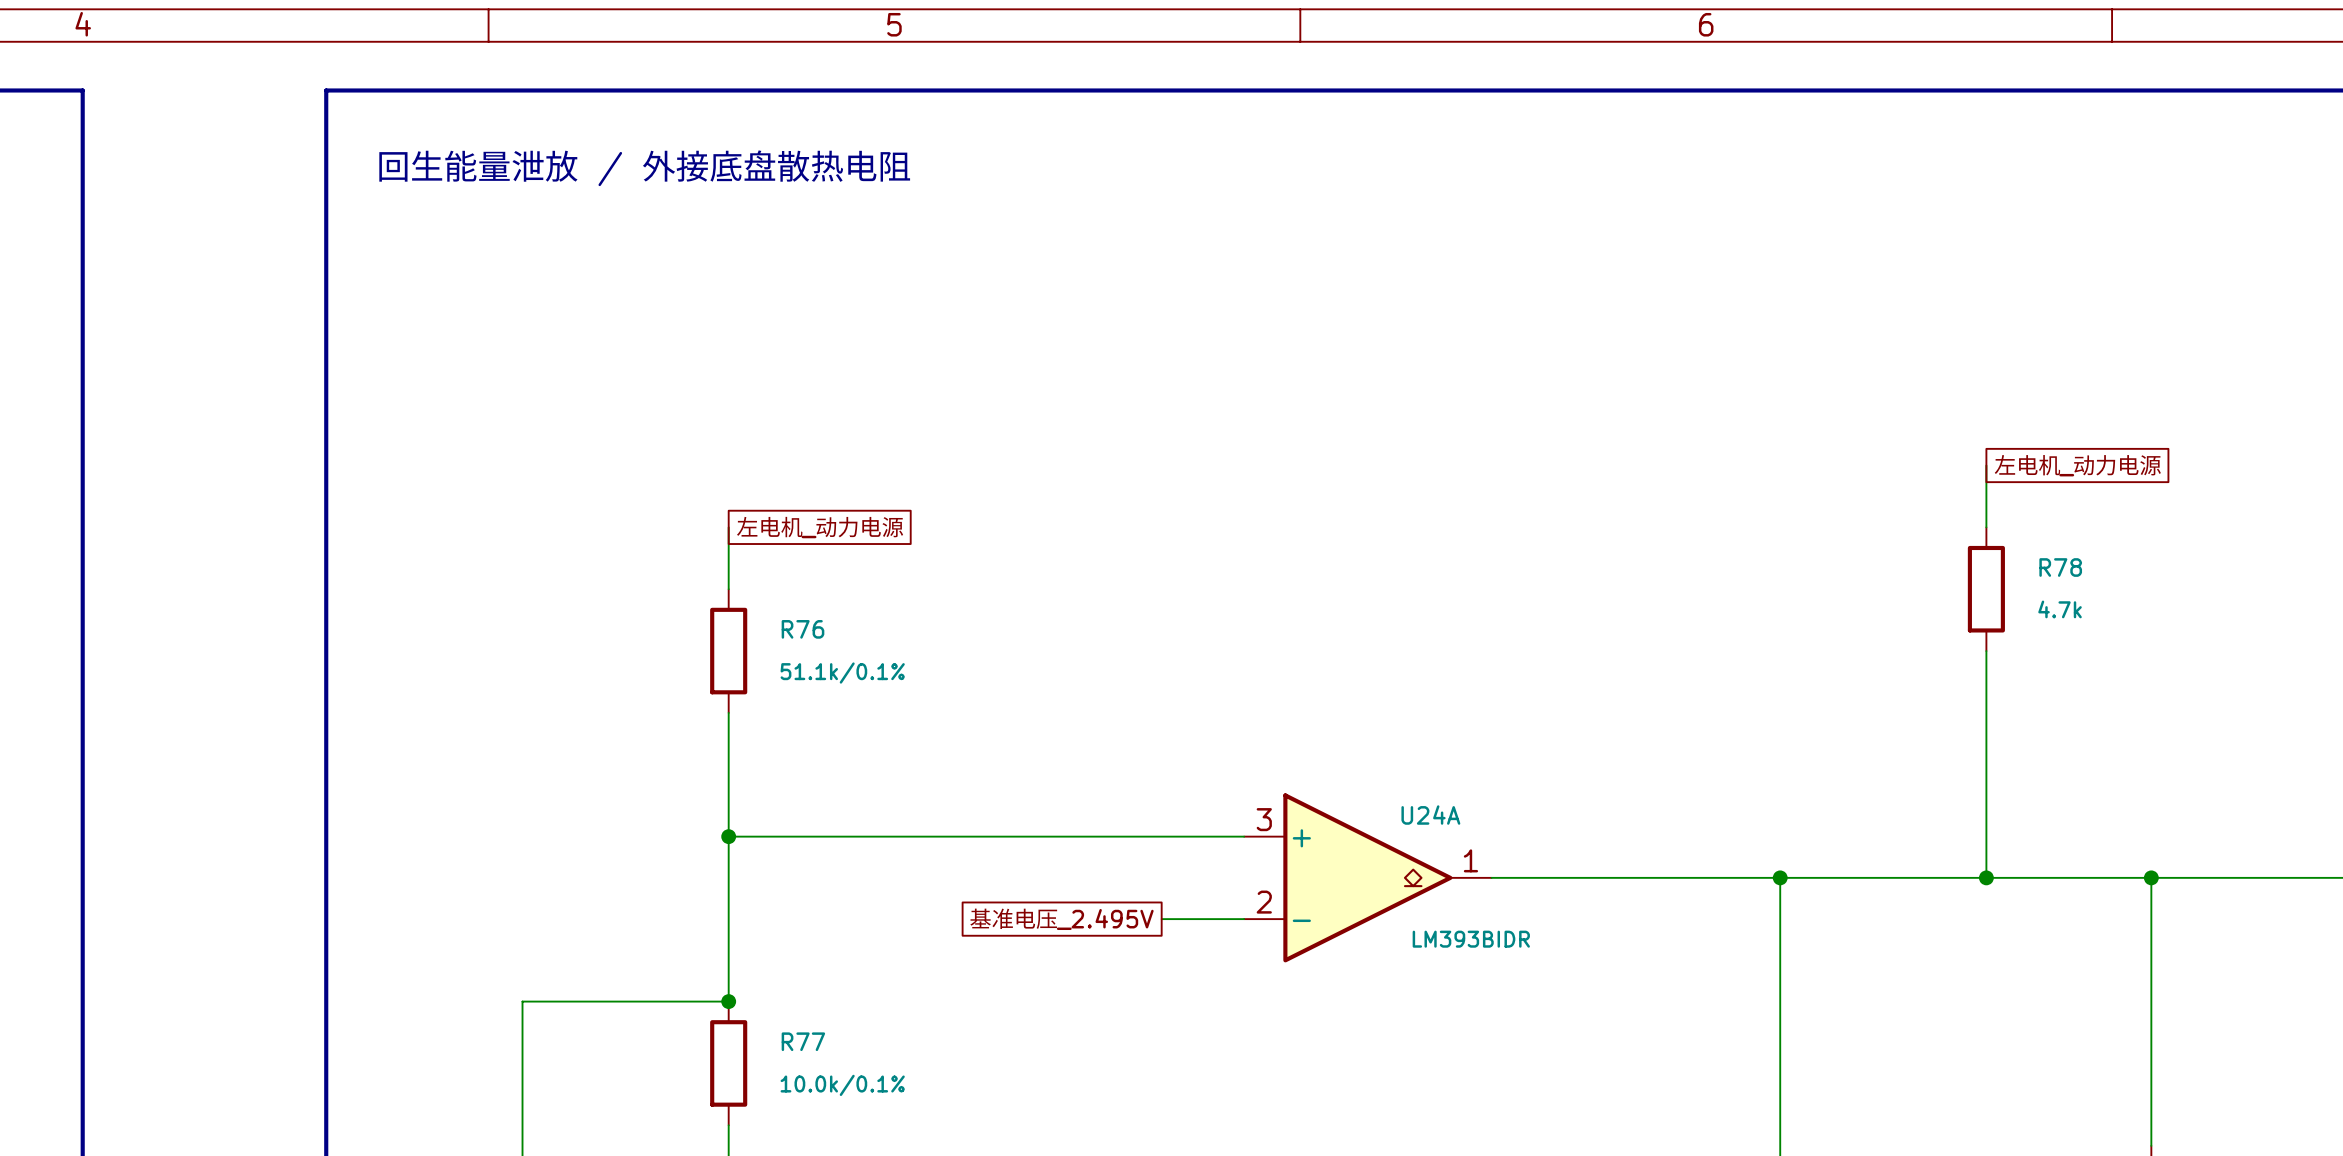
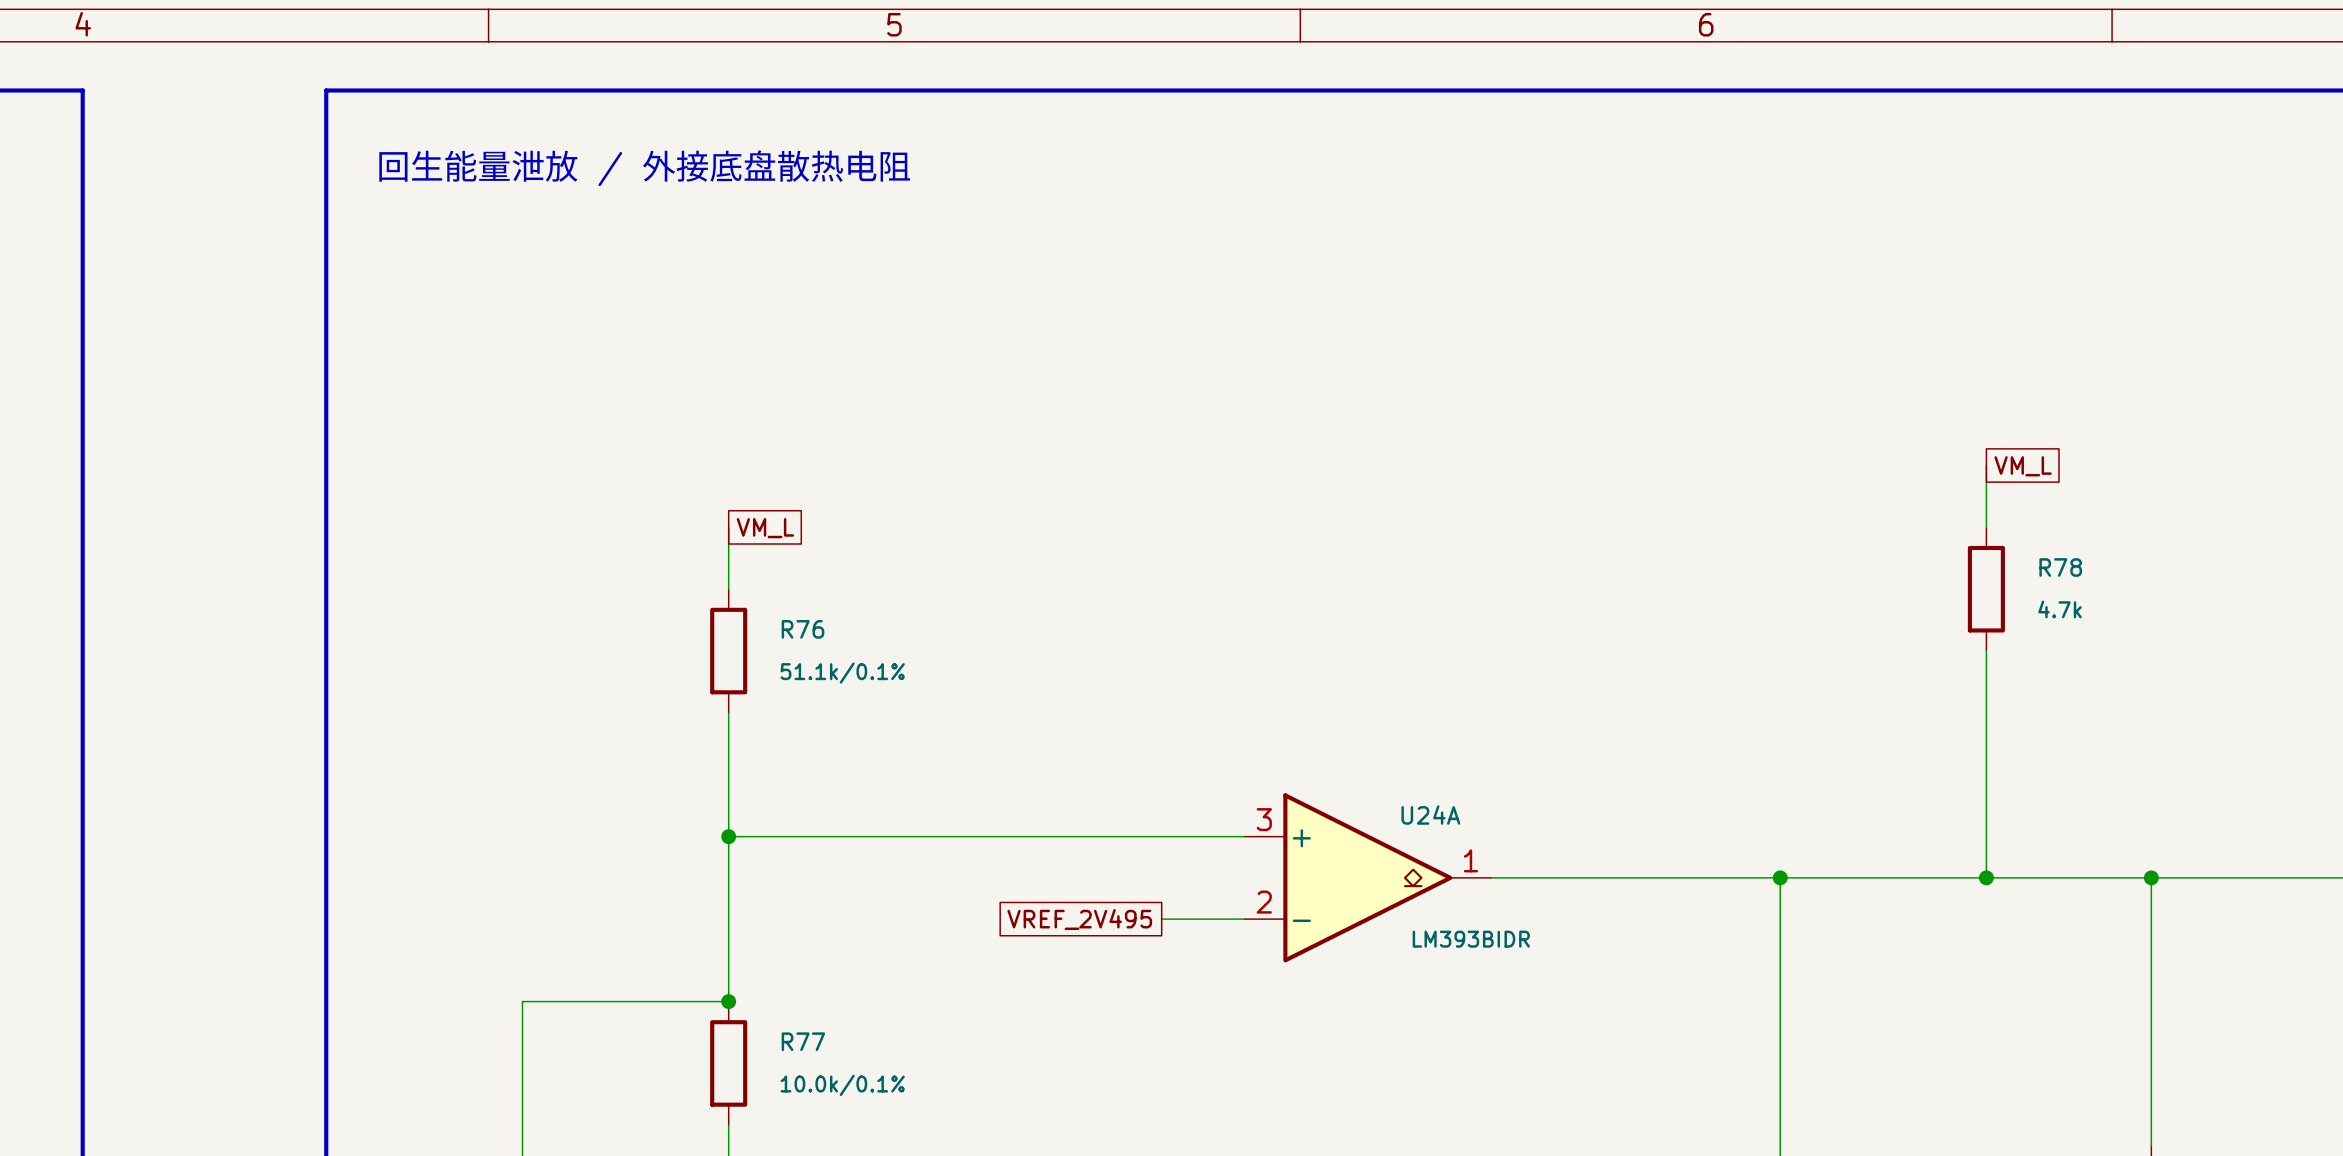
global label: 左电机_动力电源 (2077, 465) -> VM_L (2023, 466)
global label: 左电机_动力电源 (820, 527) -> VM_L (765, 528)
global label: 基准电压_2.495V (1061, 918) -> VREF_2V495 (1079, 919)

